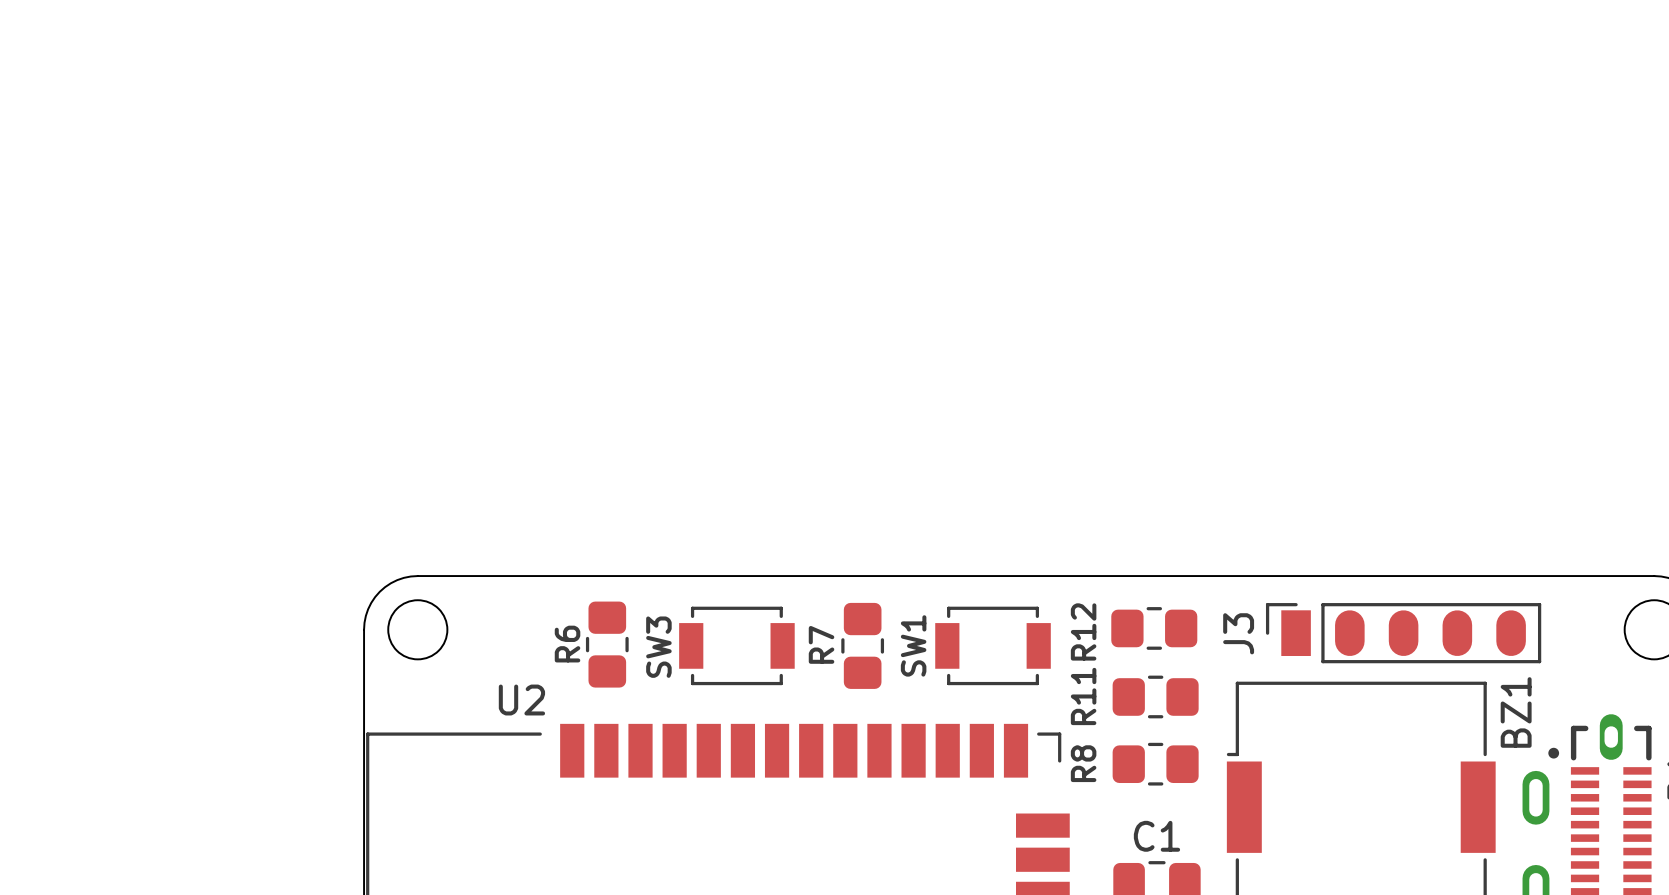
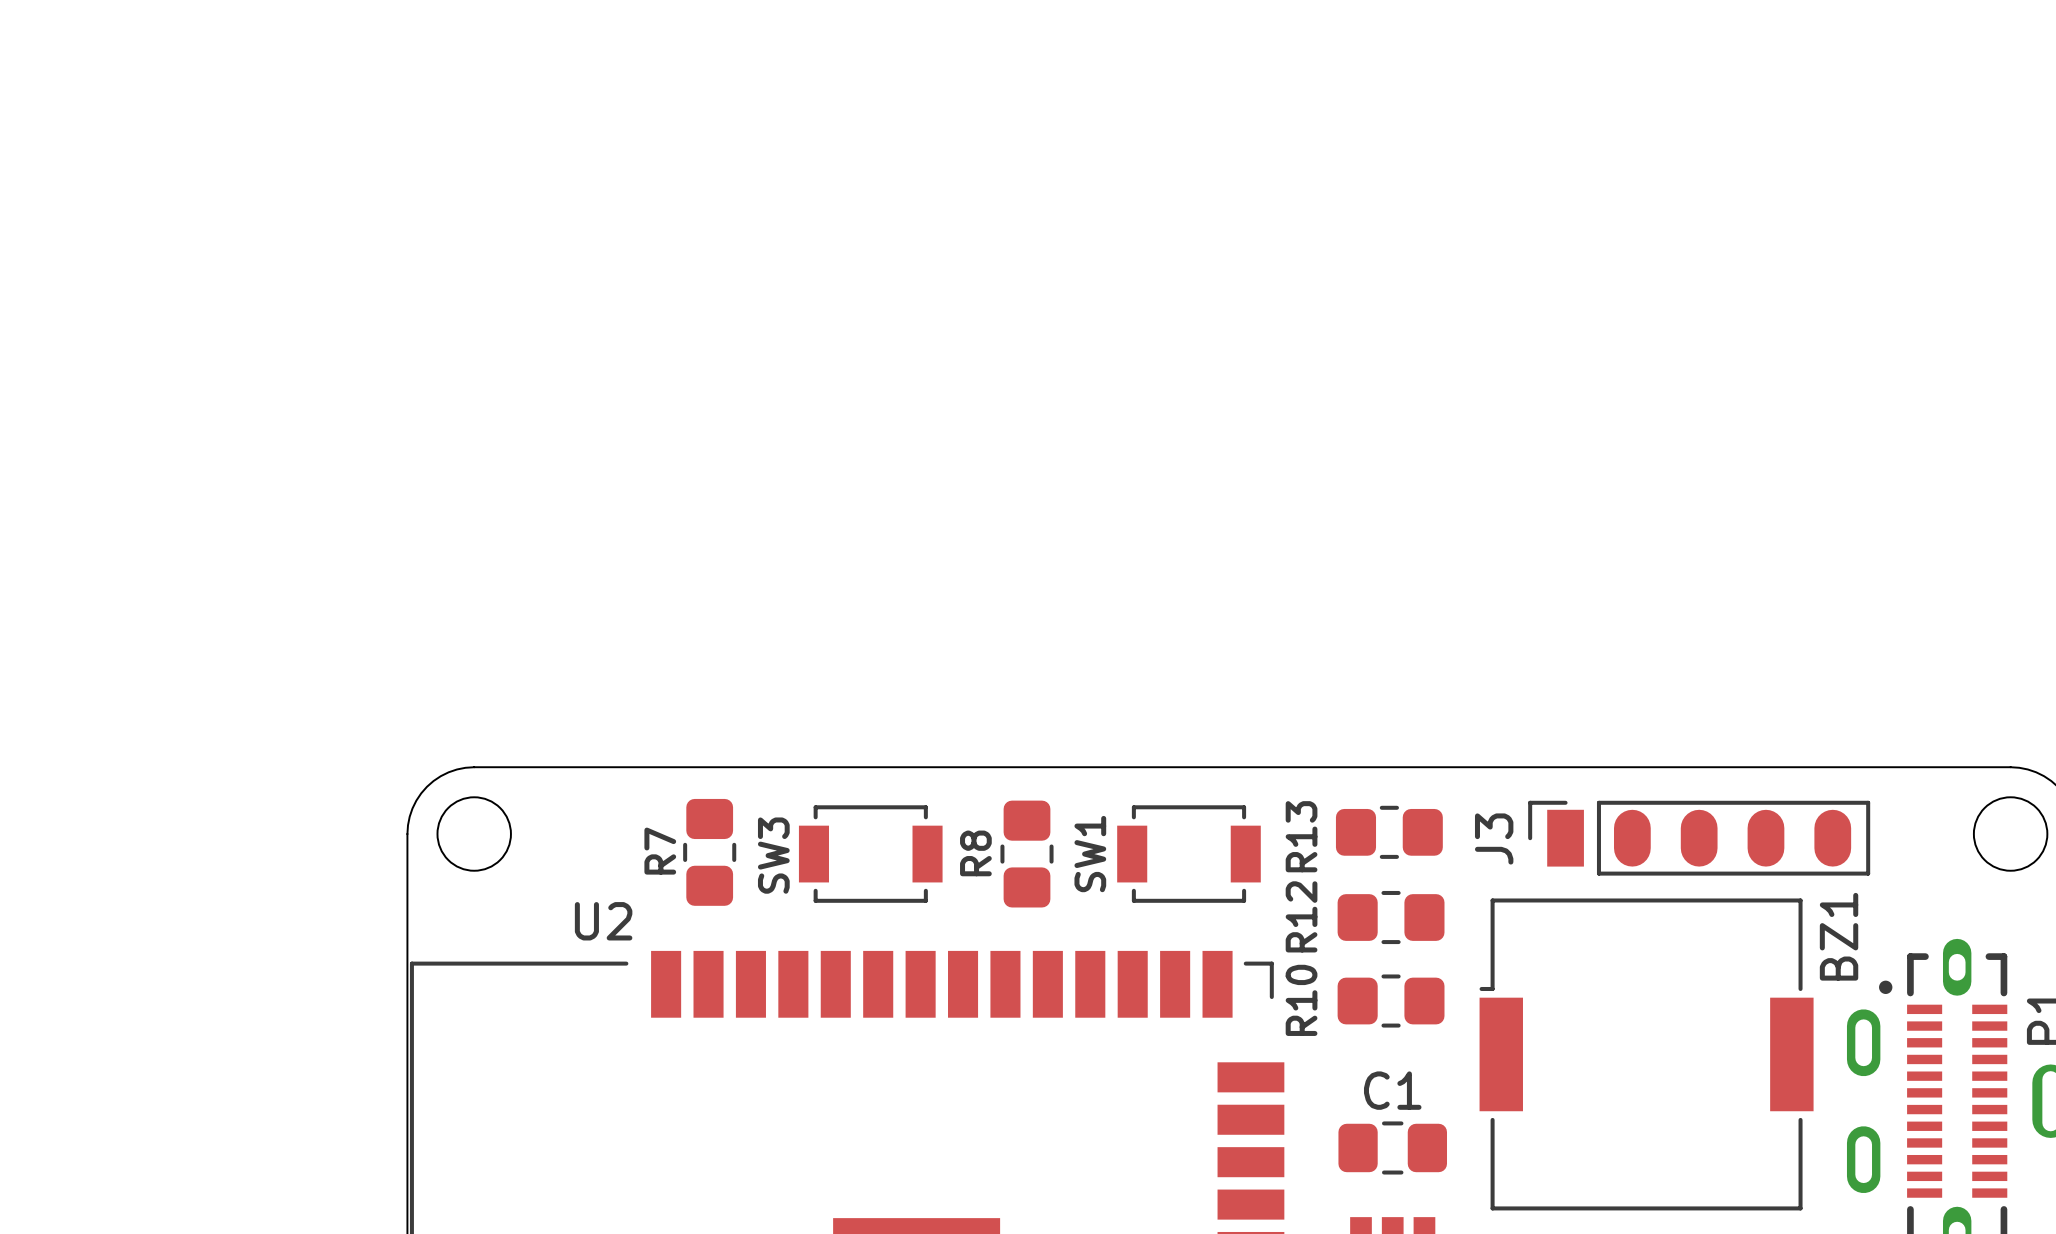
R12 name: R12 (1083, 631) -> R13 (1301, 836)
R6 name: R6 (567, 644) -> R7 (660, 851)
R7 name: R7 (821, 644) -> R8 (975, 853)
R11 name: R11 (1083, 696) -> R12 (1301, 916)
R8 name: R8 (1083, 763) -> R10 (1301, 1000)

